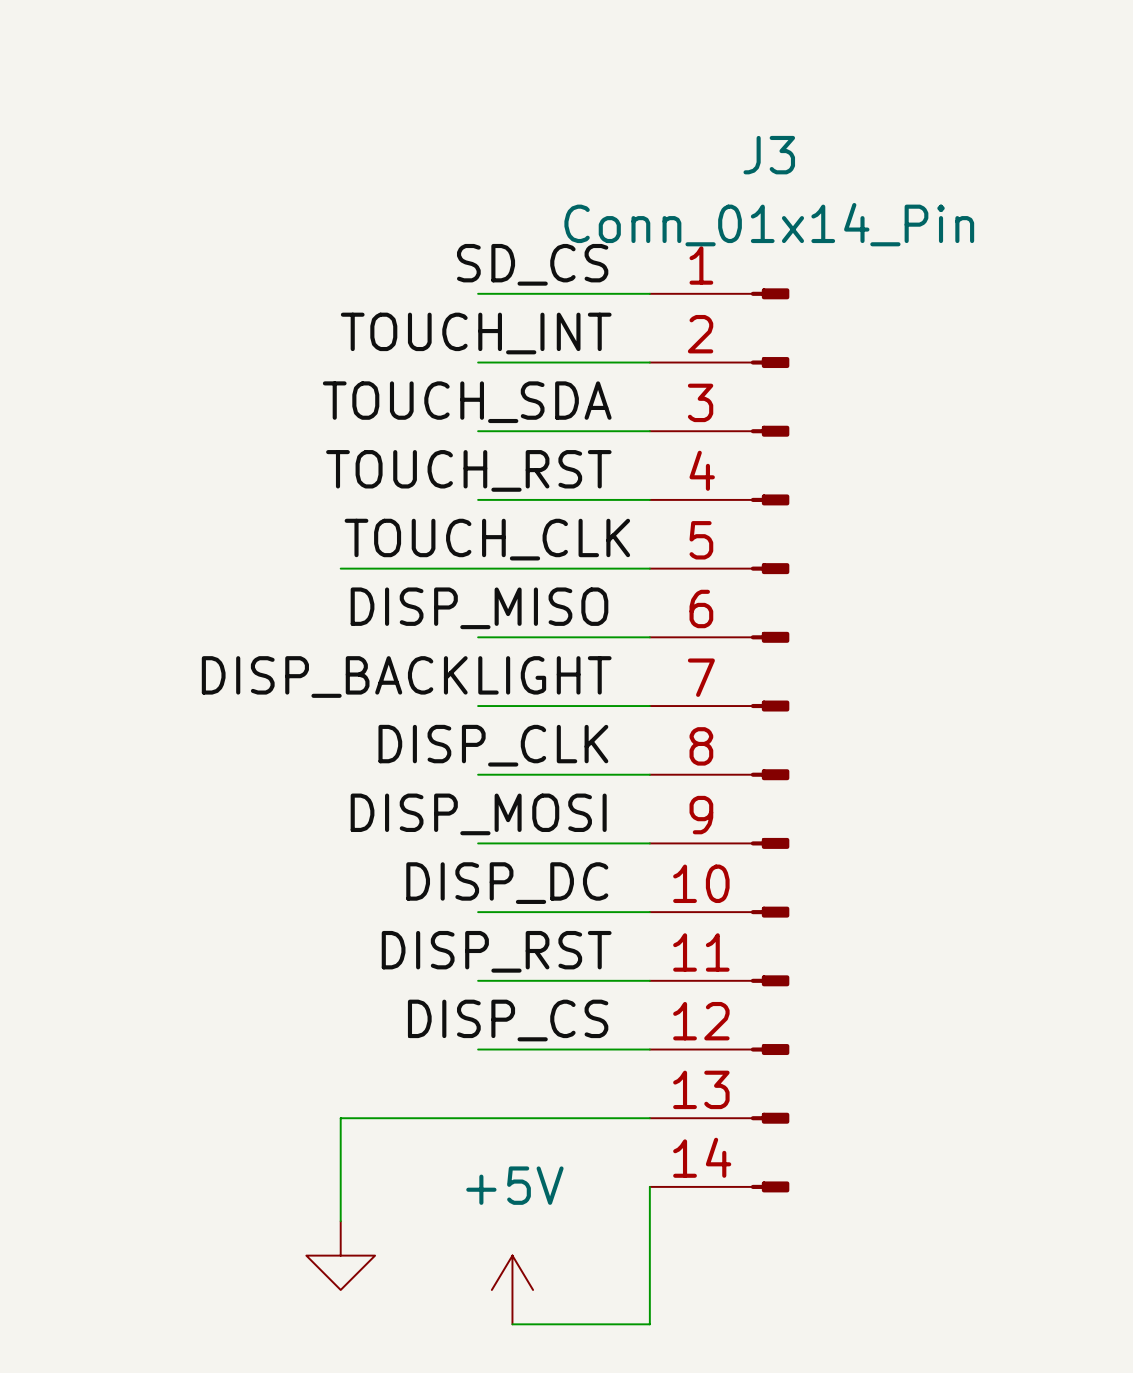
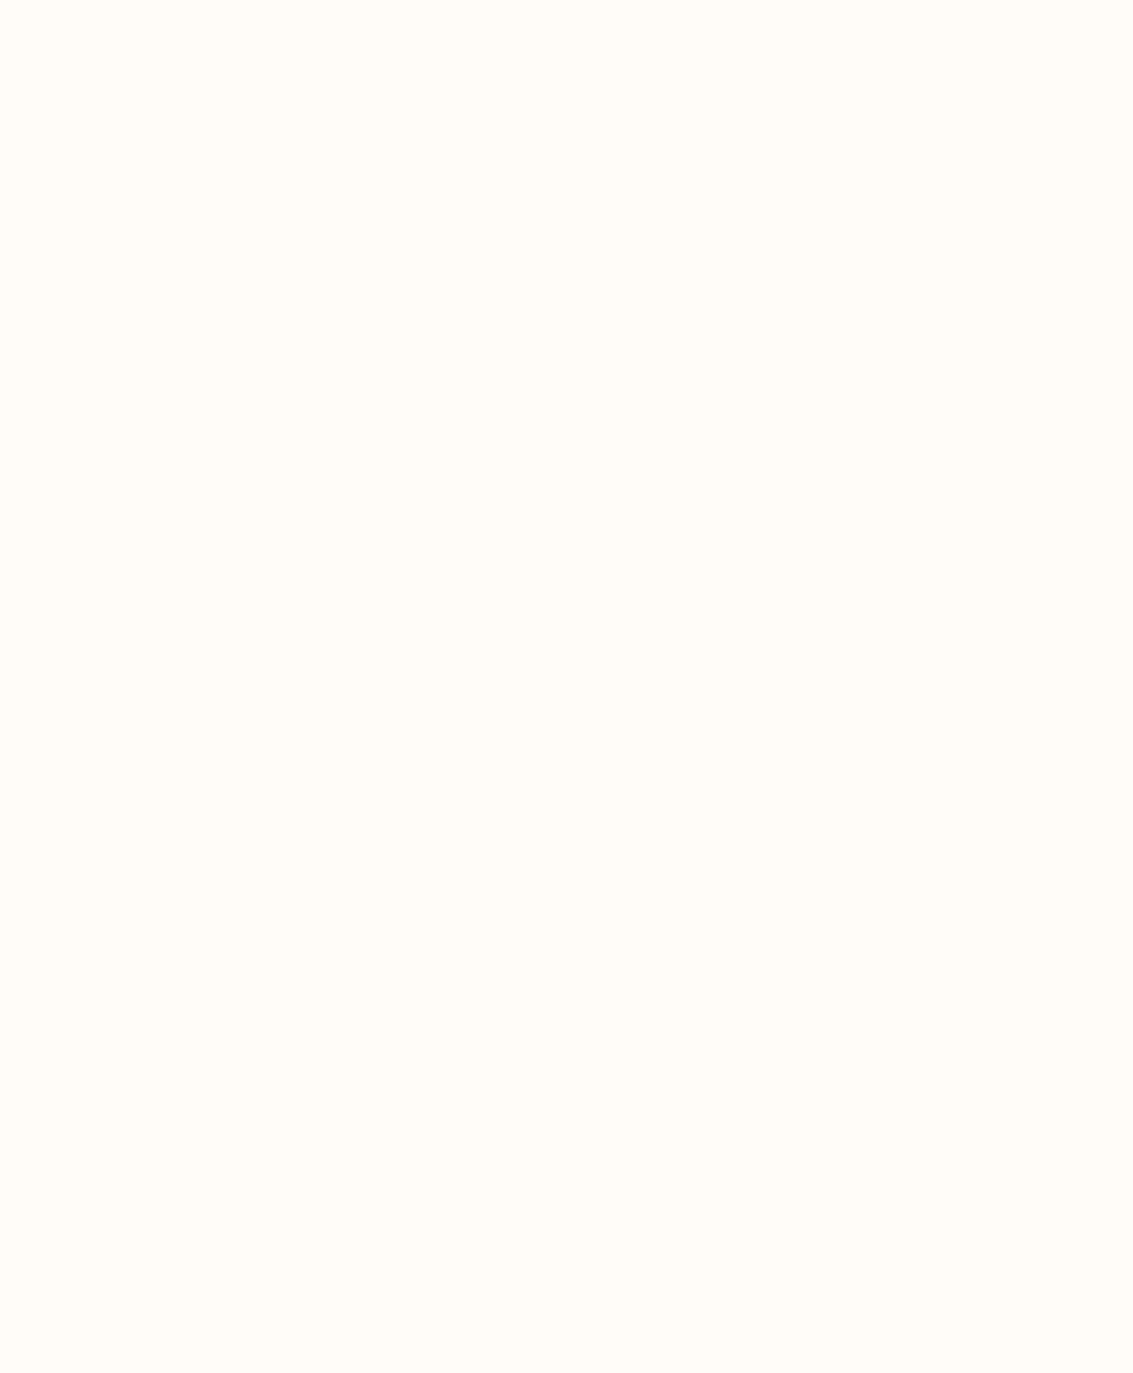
label: SD_CS (532, 264) -> none
wire: (478, 293) (649, 293) -> none
label: TOUCH_INT (476, 333) -> none
wire: (478, 362) (649, 362) -> none
label: TOUCH_SDA (467, 402) -> none
wire: (478, 431) (649, 431) -> none
label: TOUCH_RST (468, 470) -> none
wire: (478, 499) (649, 499) -> none
label: TOUCH_CLK (487, 539) -> none
wire: (340, 568) (649, 568) -> none
label: DISP_MISO (479, 608) -> none
wire: (478, 637) (649, 637) -> none
label: DISP_BACKLIGHT (406, 677) -> none
wire: (478, 706) (649, 706) -> none
J3: Conn_01x14_Pin (719, 740) -> none
label: DISP_CLK (493, 745) -> none
wire: (478, 774) (649, 774) -> none
label: DISP_MOSI (478, 814) -> none
wire: (478, 843) (649, 843) -> none
label: DISP_DC (507, 883) -> none
wire: (478, 912) (649, 912) -> none
label: DISP_RST (496, 951) -> none
wire: (478, 980) (649, 980) -> none
label: DISP_CS (508, 1020) -> none
wire: (478, 1049) (649, 1049) -> none
wire: (649, 1118) (340, 1118) (340, 1221) -> none
wire: (649, 1186) (649, 1324) (512, 1324) -> none
power symbol: (340, 1255) -> none
power symbol: +5V (512, 1289) -> none

